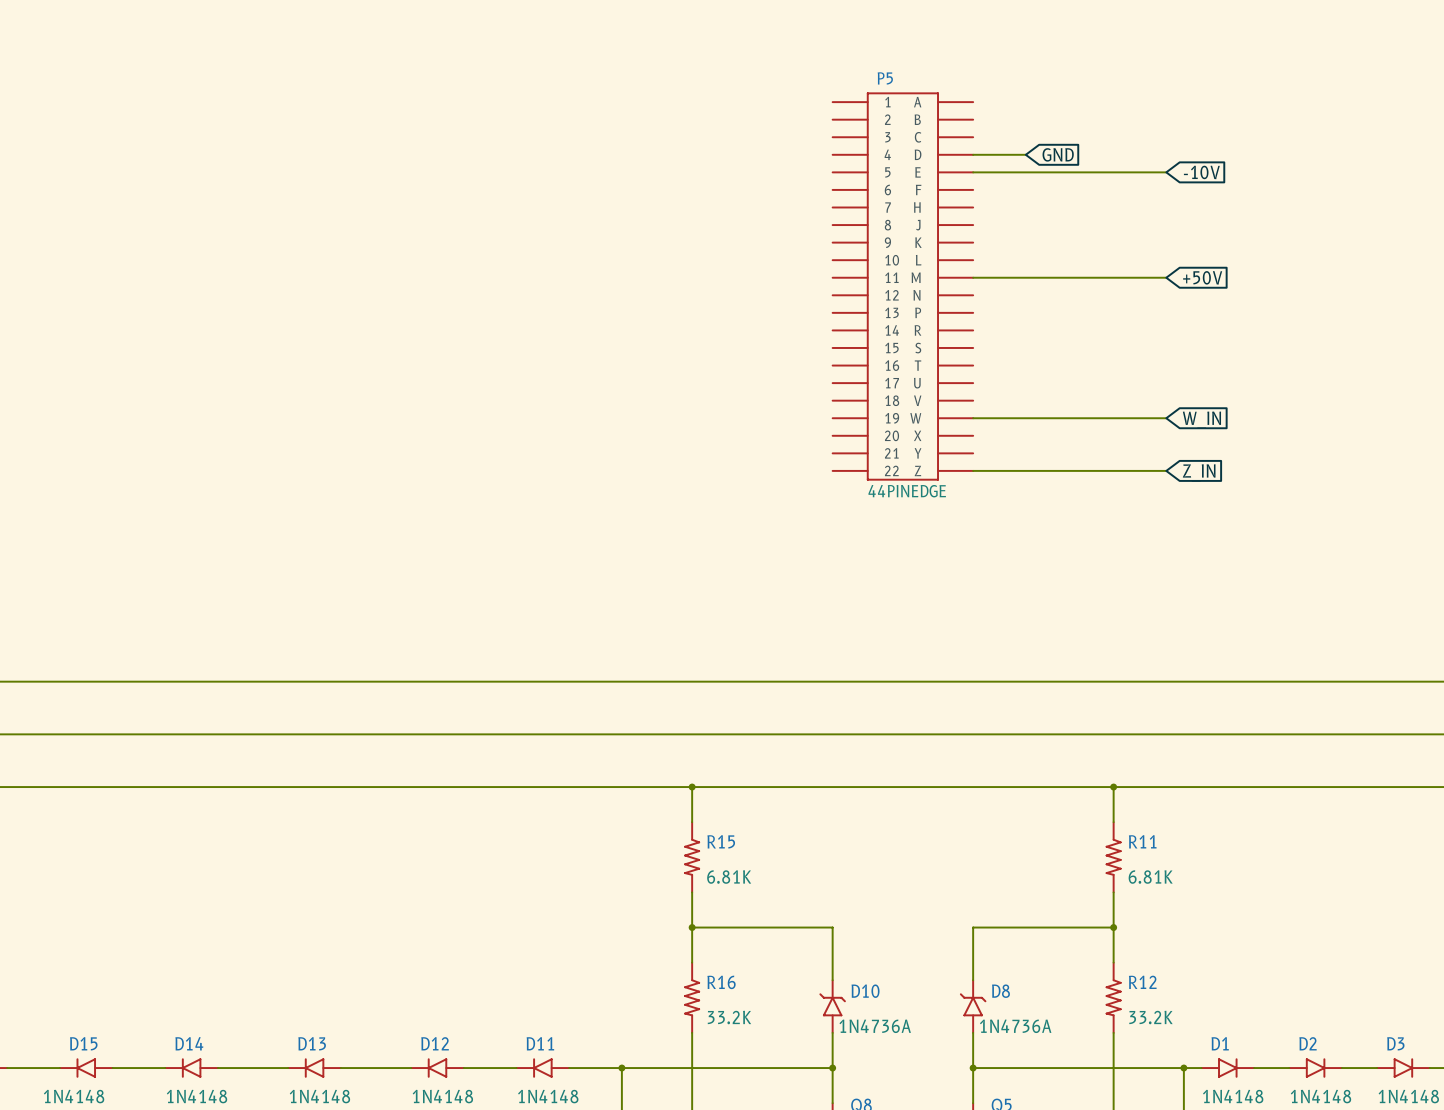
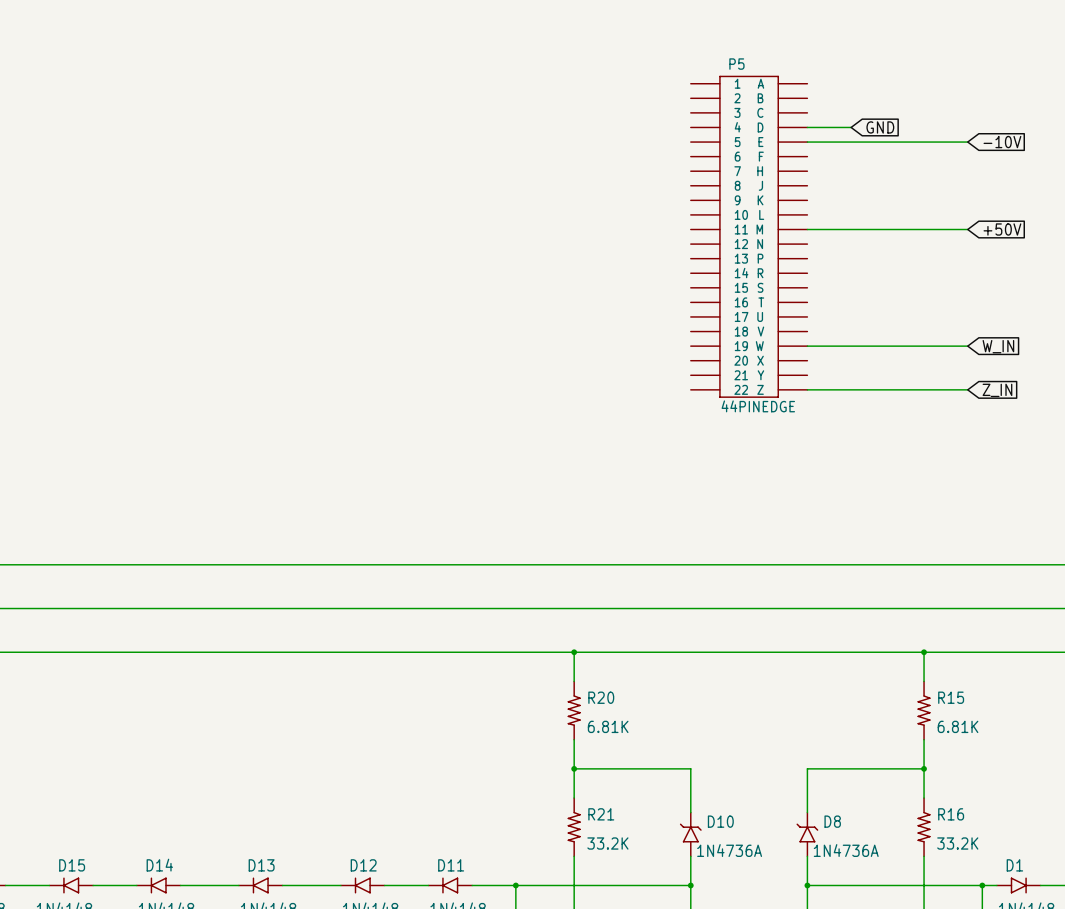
R15 name: R15 (721, 841) -> R20 (601, 697)
R11 name: R11 (1142, 841) -> R15 (951, 697)
R16 name: R16 (721, 982) -> R21 (601, 814)
R12 name: R12 (1142, 982) -> R16 (951, 814)

